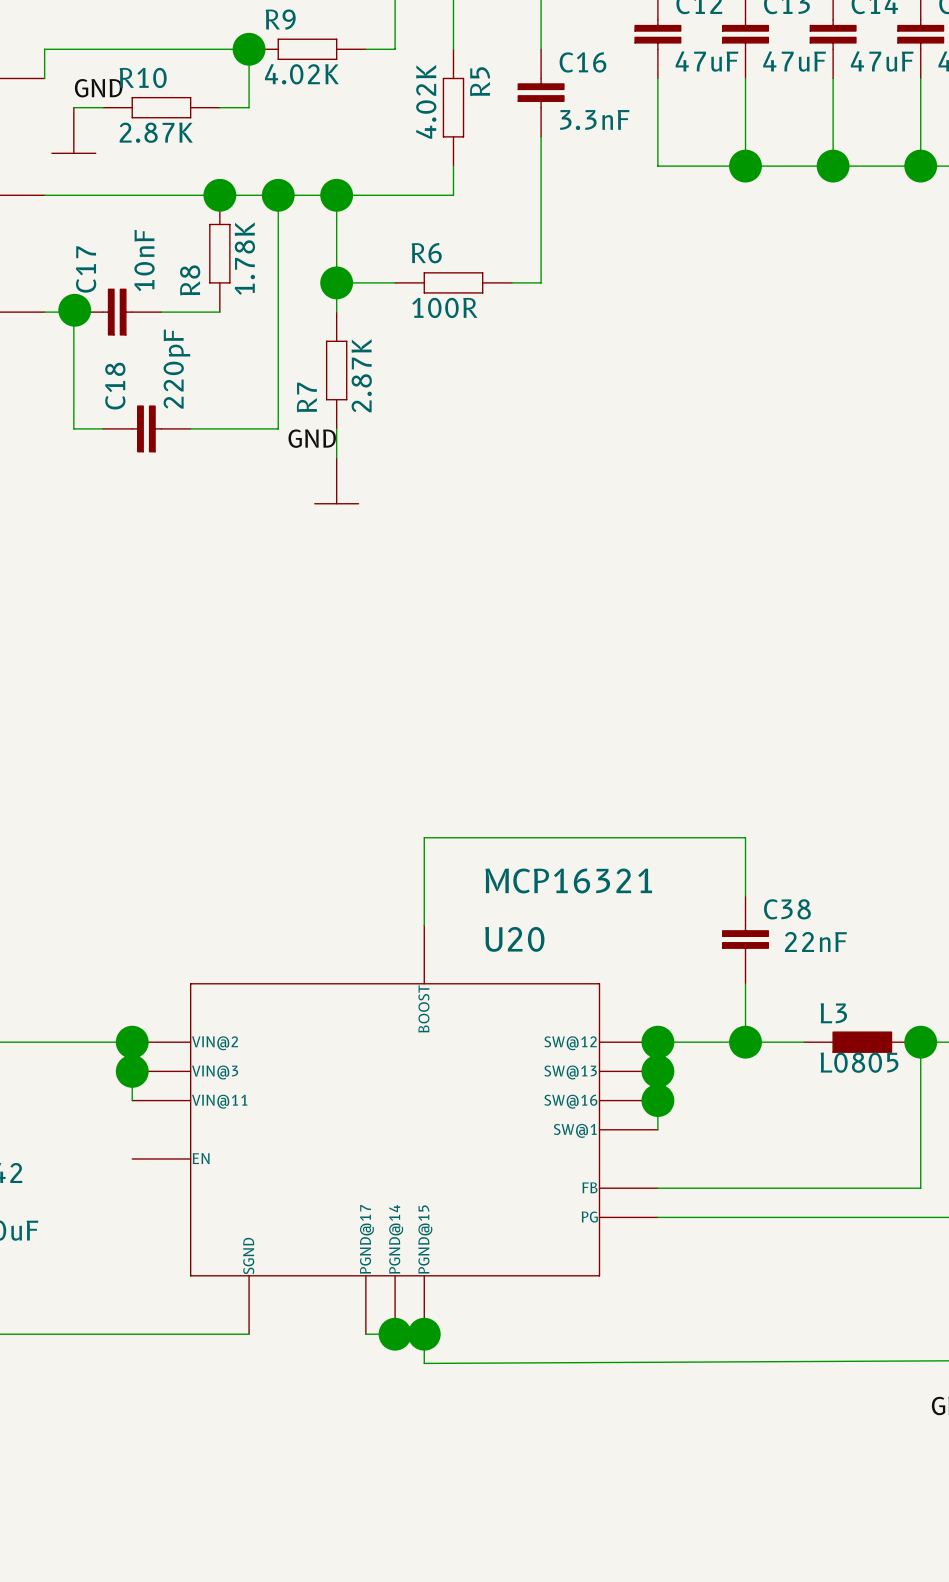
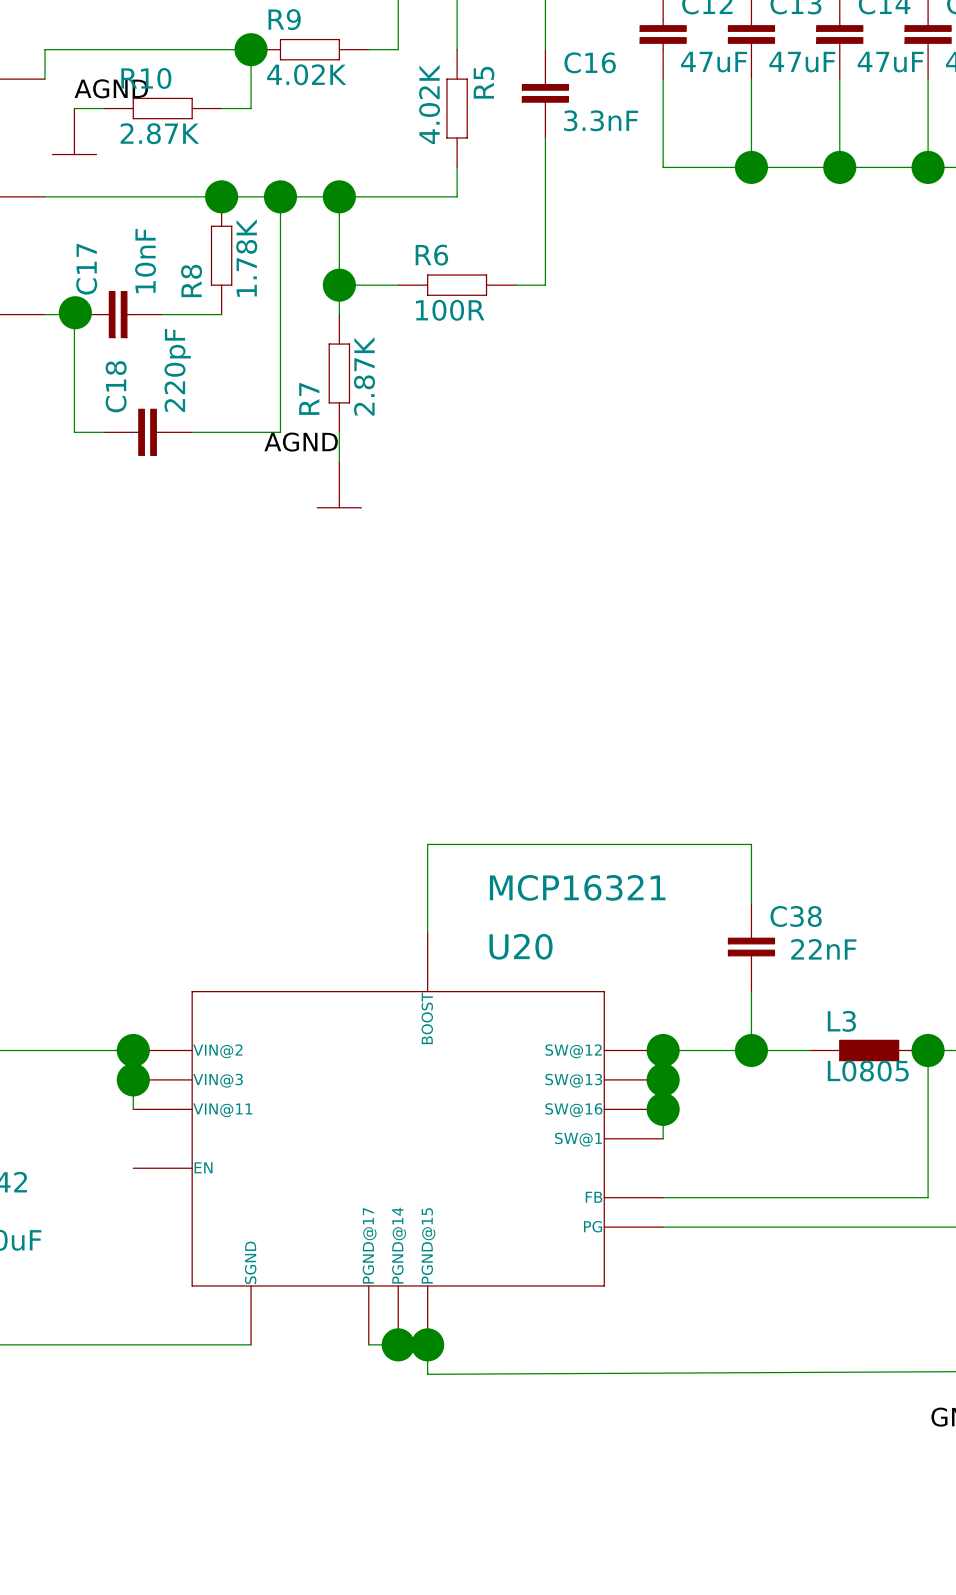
label: GND (98, 88) -> AGND (111, 88)
label: GND (312, 438) -> AGND (301, 442)

